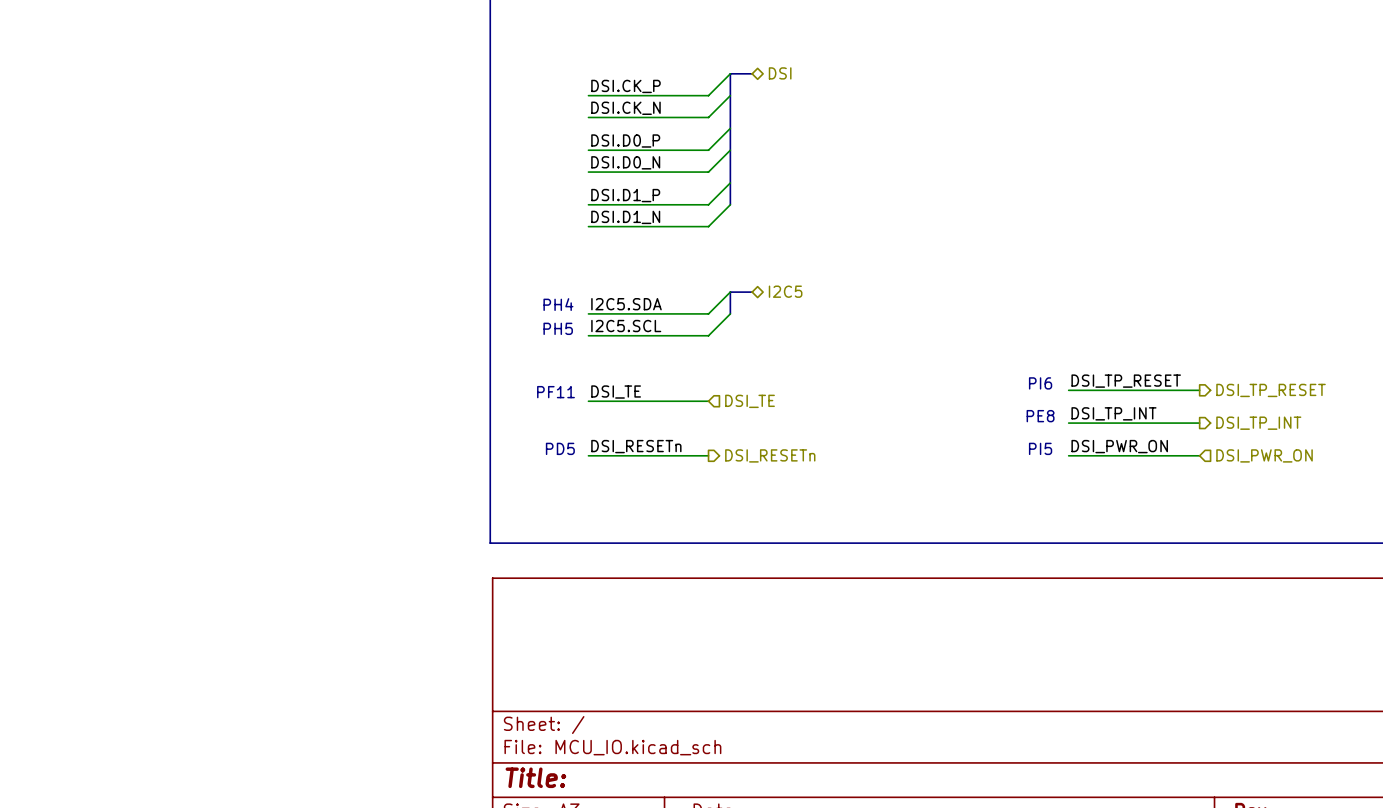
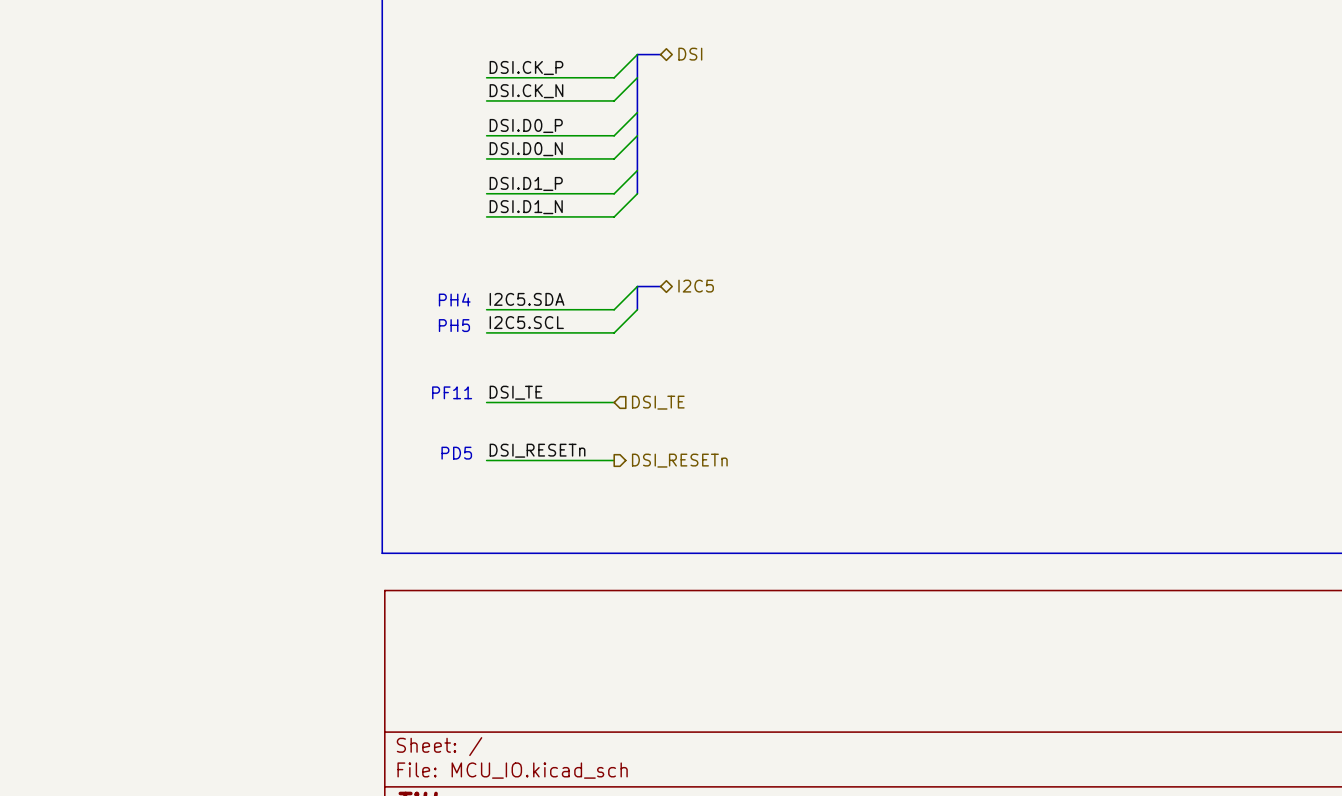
label: DSI_TP_RESET (1126, 381) -> none
text: PI6 (1040, 383) -> none
wire: (1068, 390) (1199, 390) -> none
hierarchical label: DSI_TP_RESET (1271, 390) -> none
label: DSI_TP_INT (1113, 413) -> none
text: PE8 (1040, 416) -> none
wire: (1068, 423) (1199, 423) -> none
hierarchical label: DSI_TP_INT (1258, 423) -> none
label: DSI_PWR_ON (1119, 446) -> none
text: PI5 (1040, 448) -> none
wire: (1068, 455) (1199, 455) -> none
hierarchical label: DSI_PWR_ON (1264, 455) -> none

